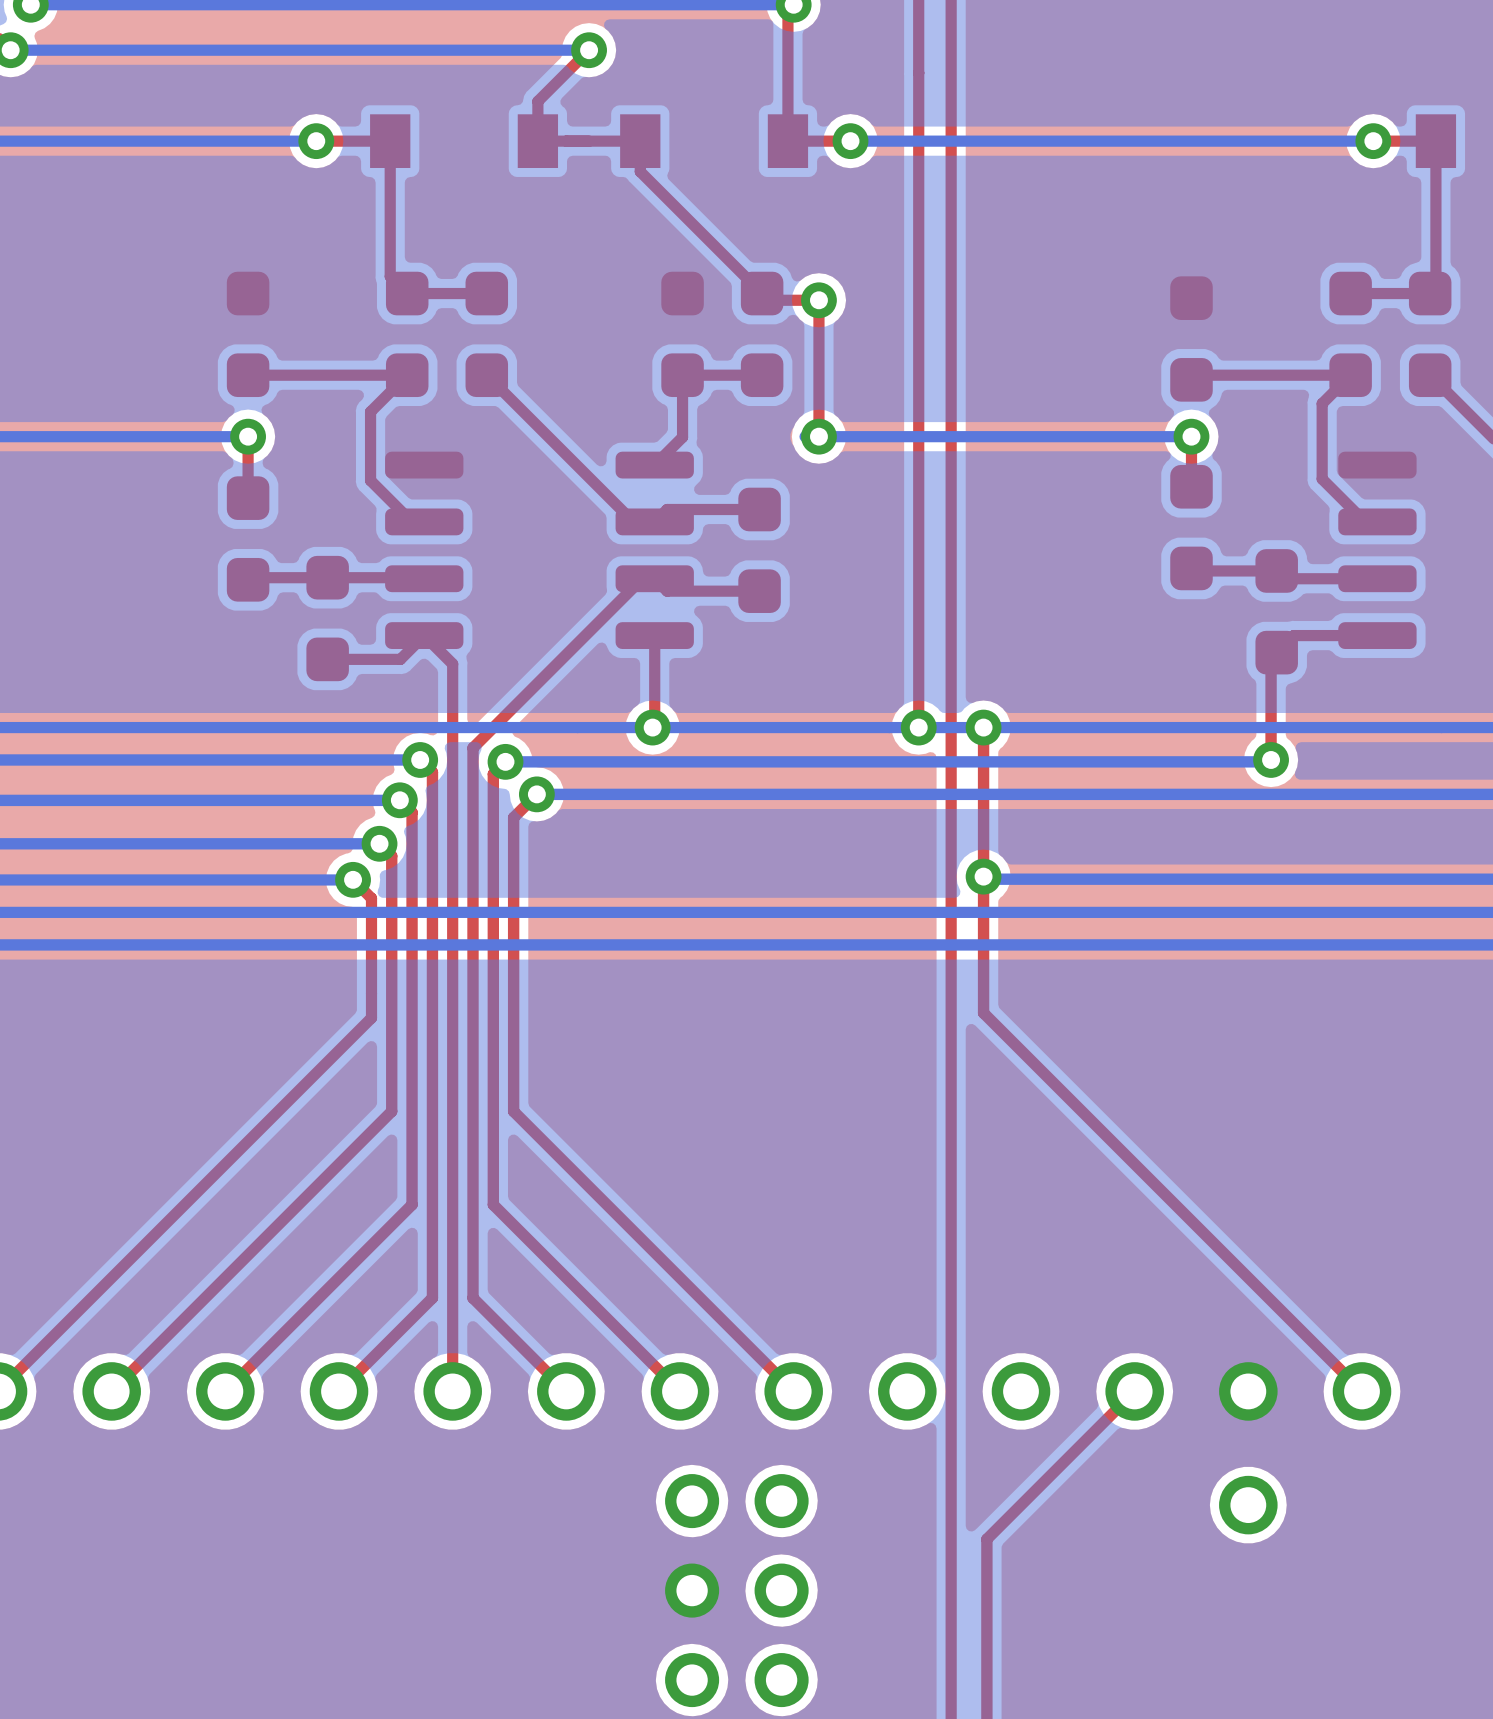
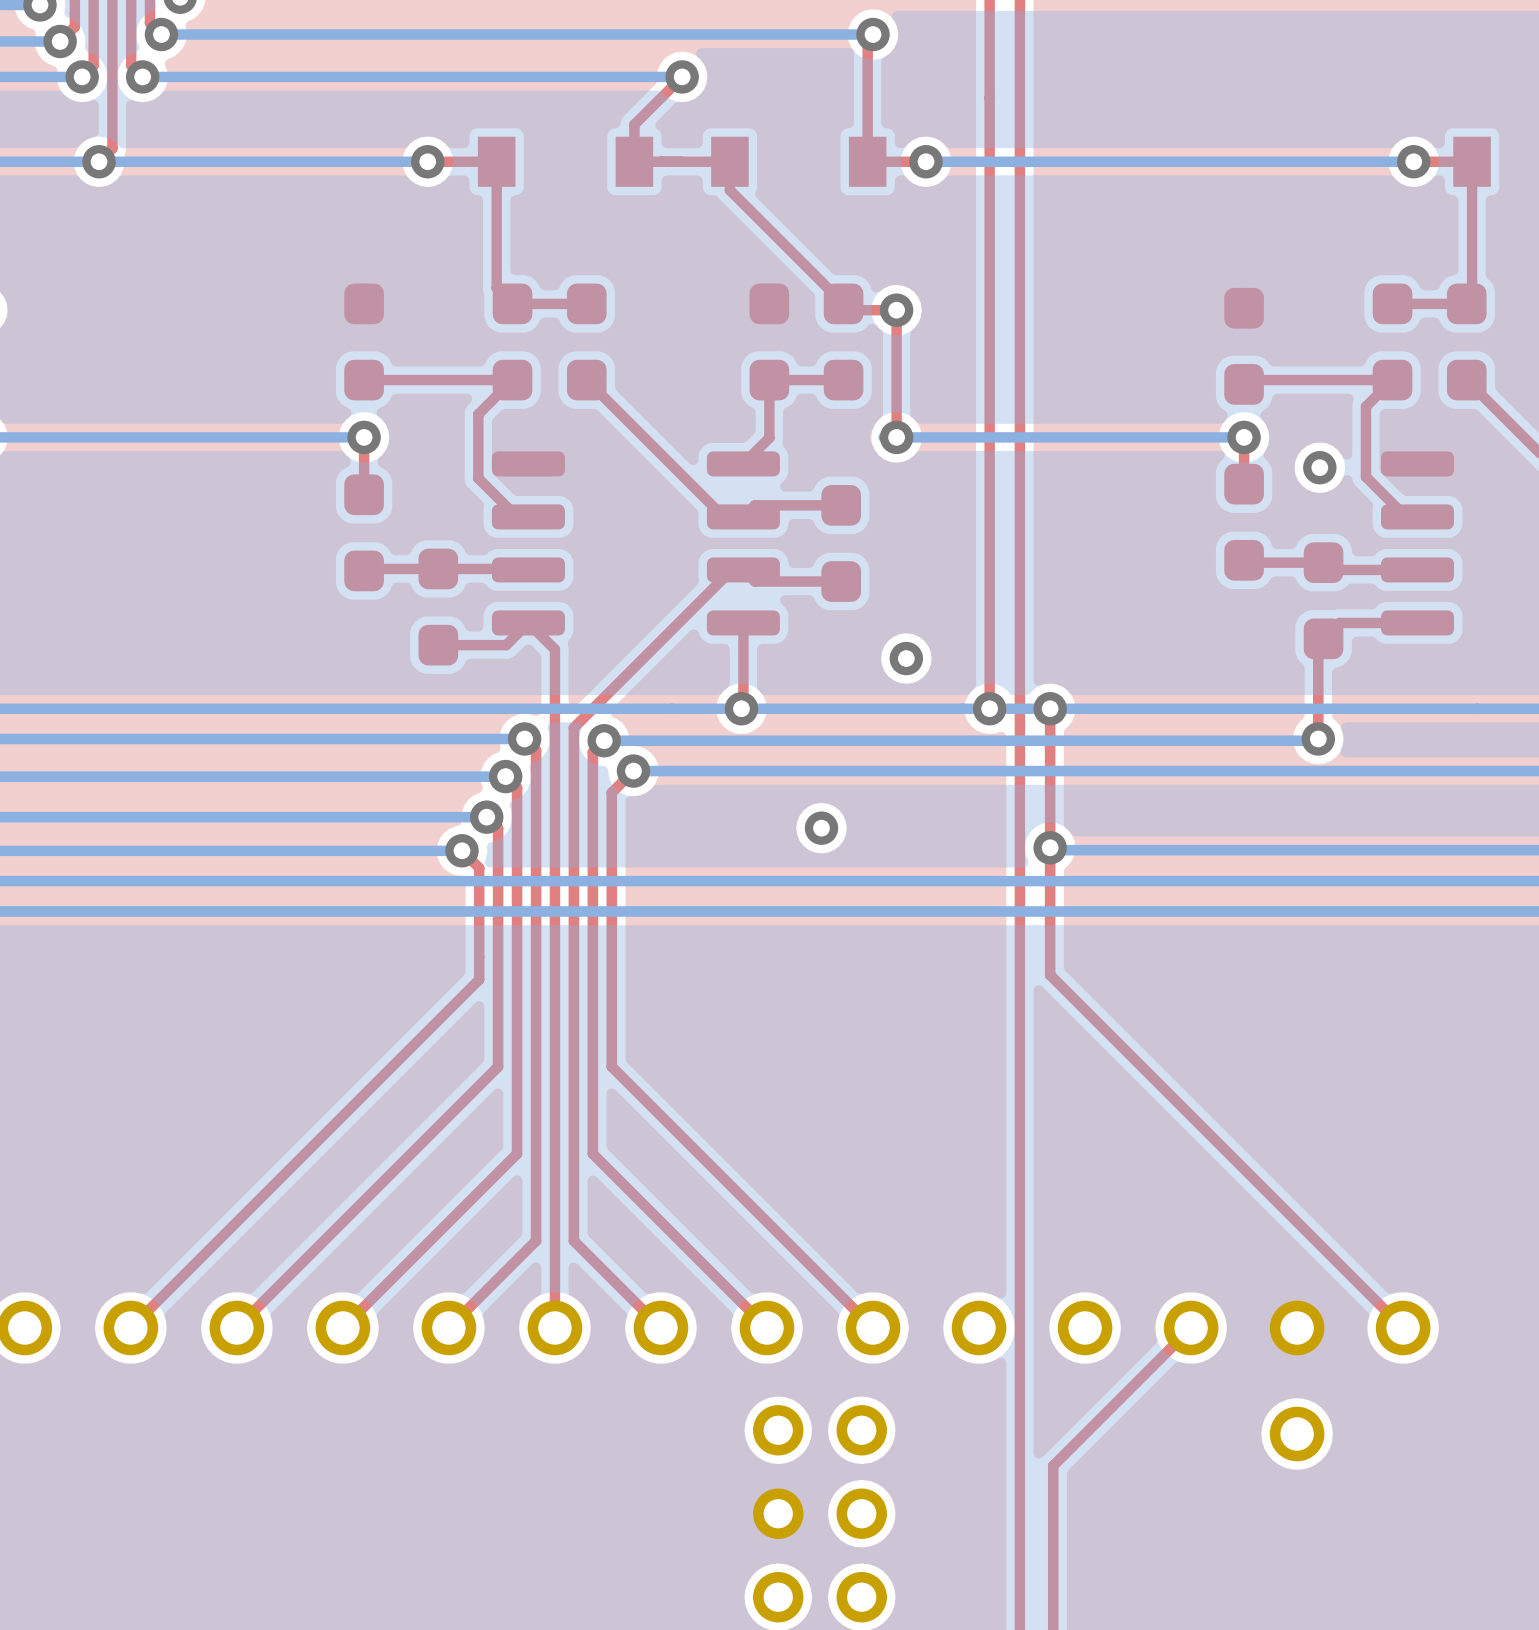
via: none -> (1319, 467)
via: none -> (906, 658)
via: none -> (821, 828)

